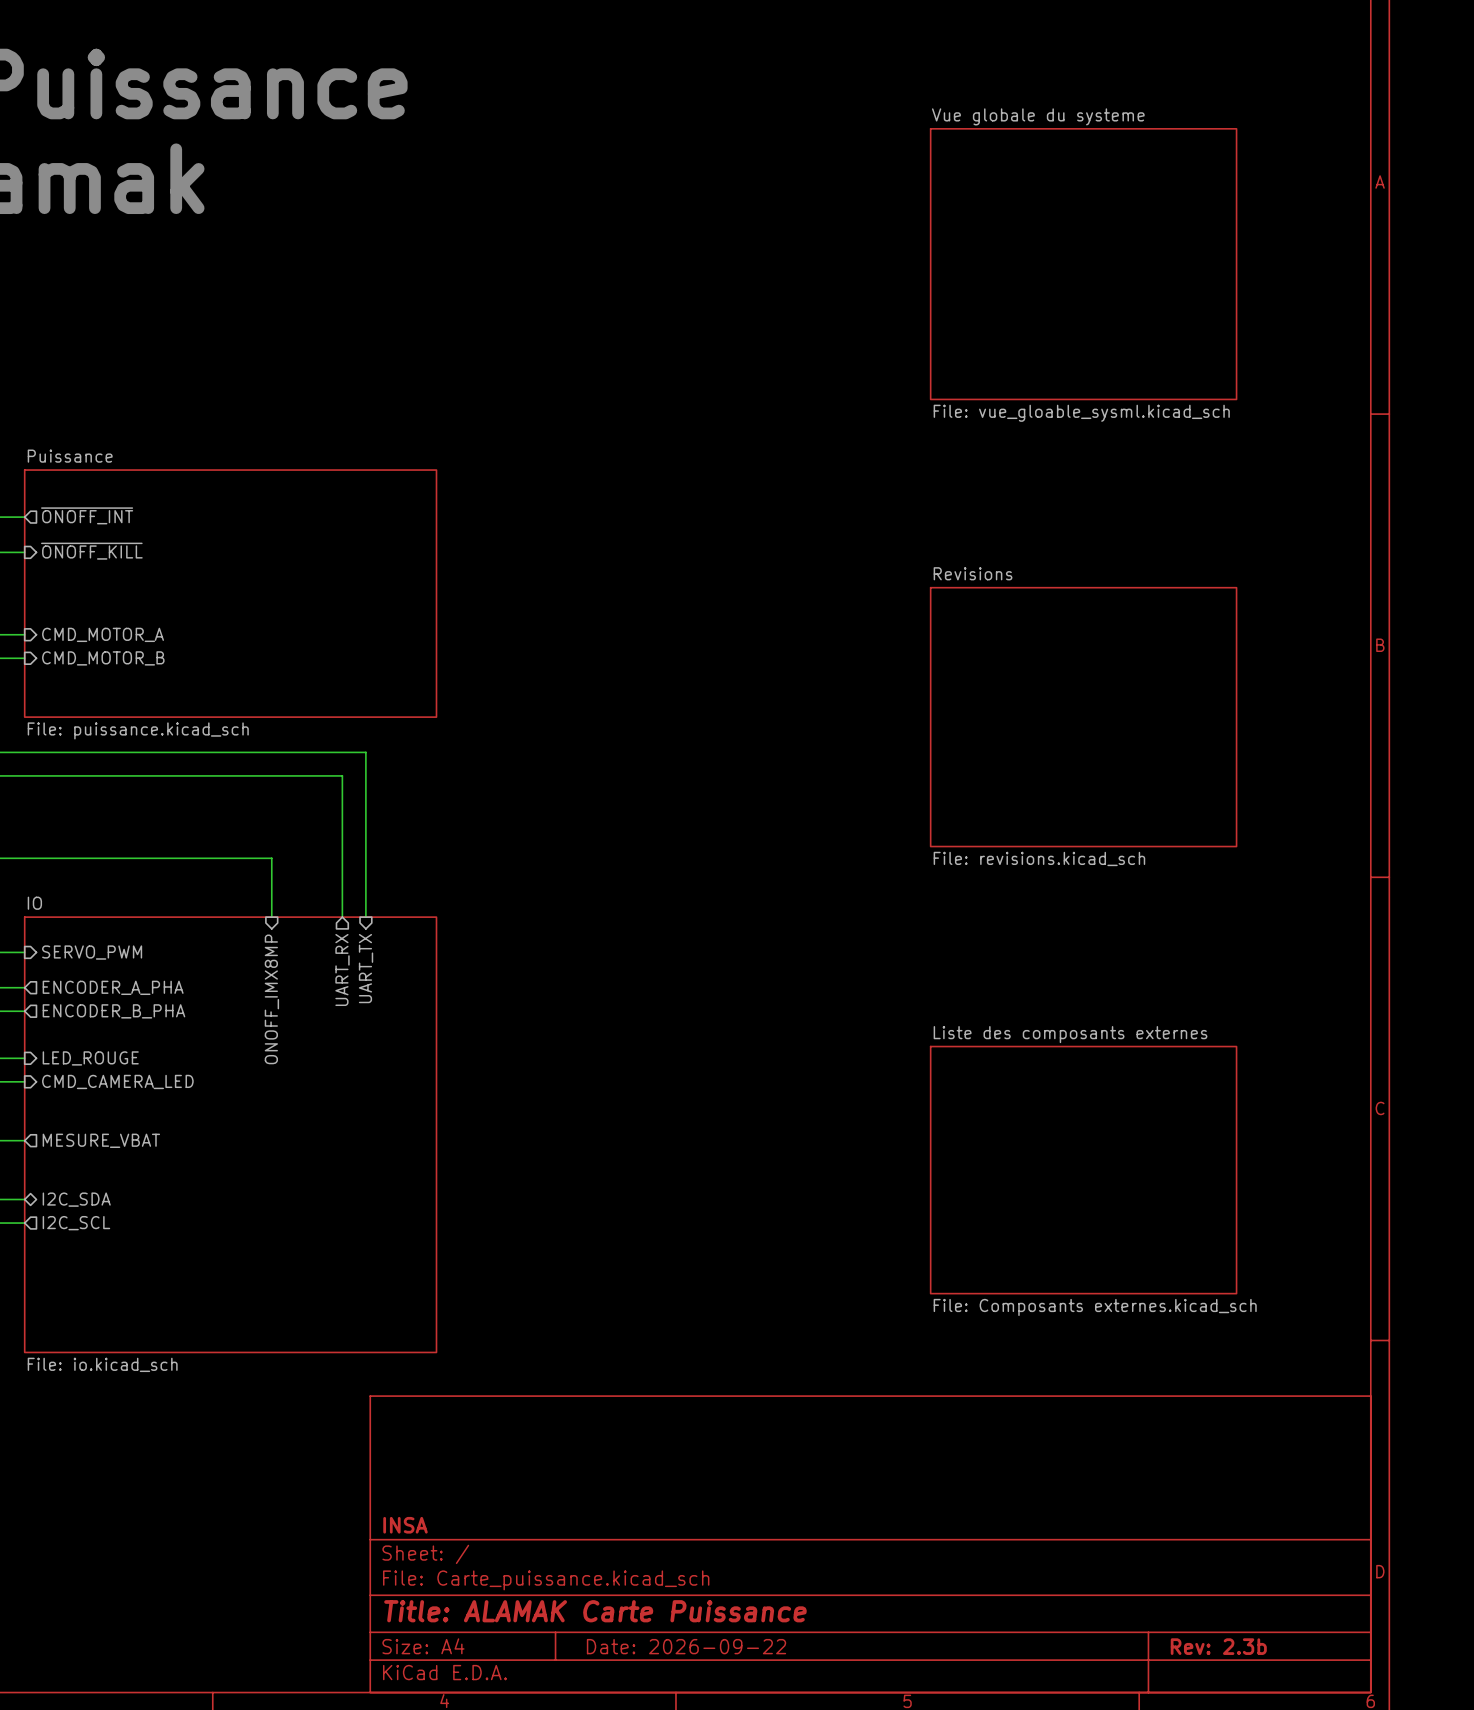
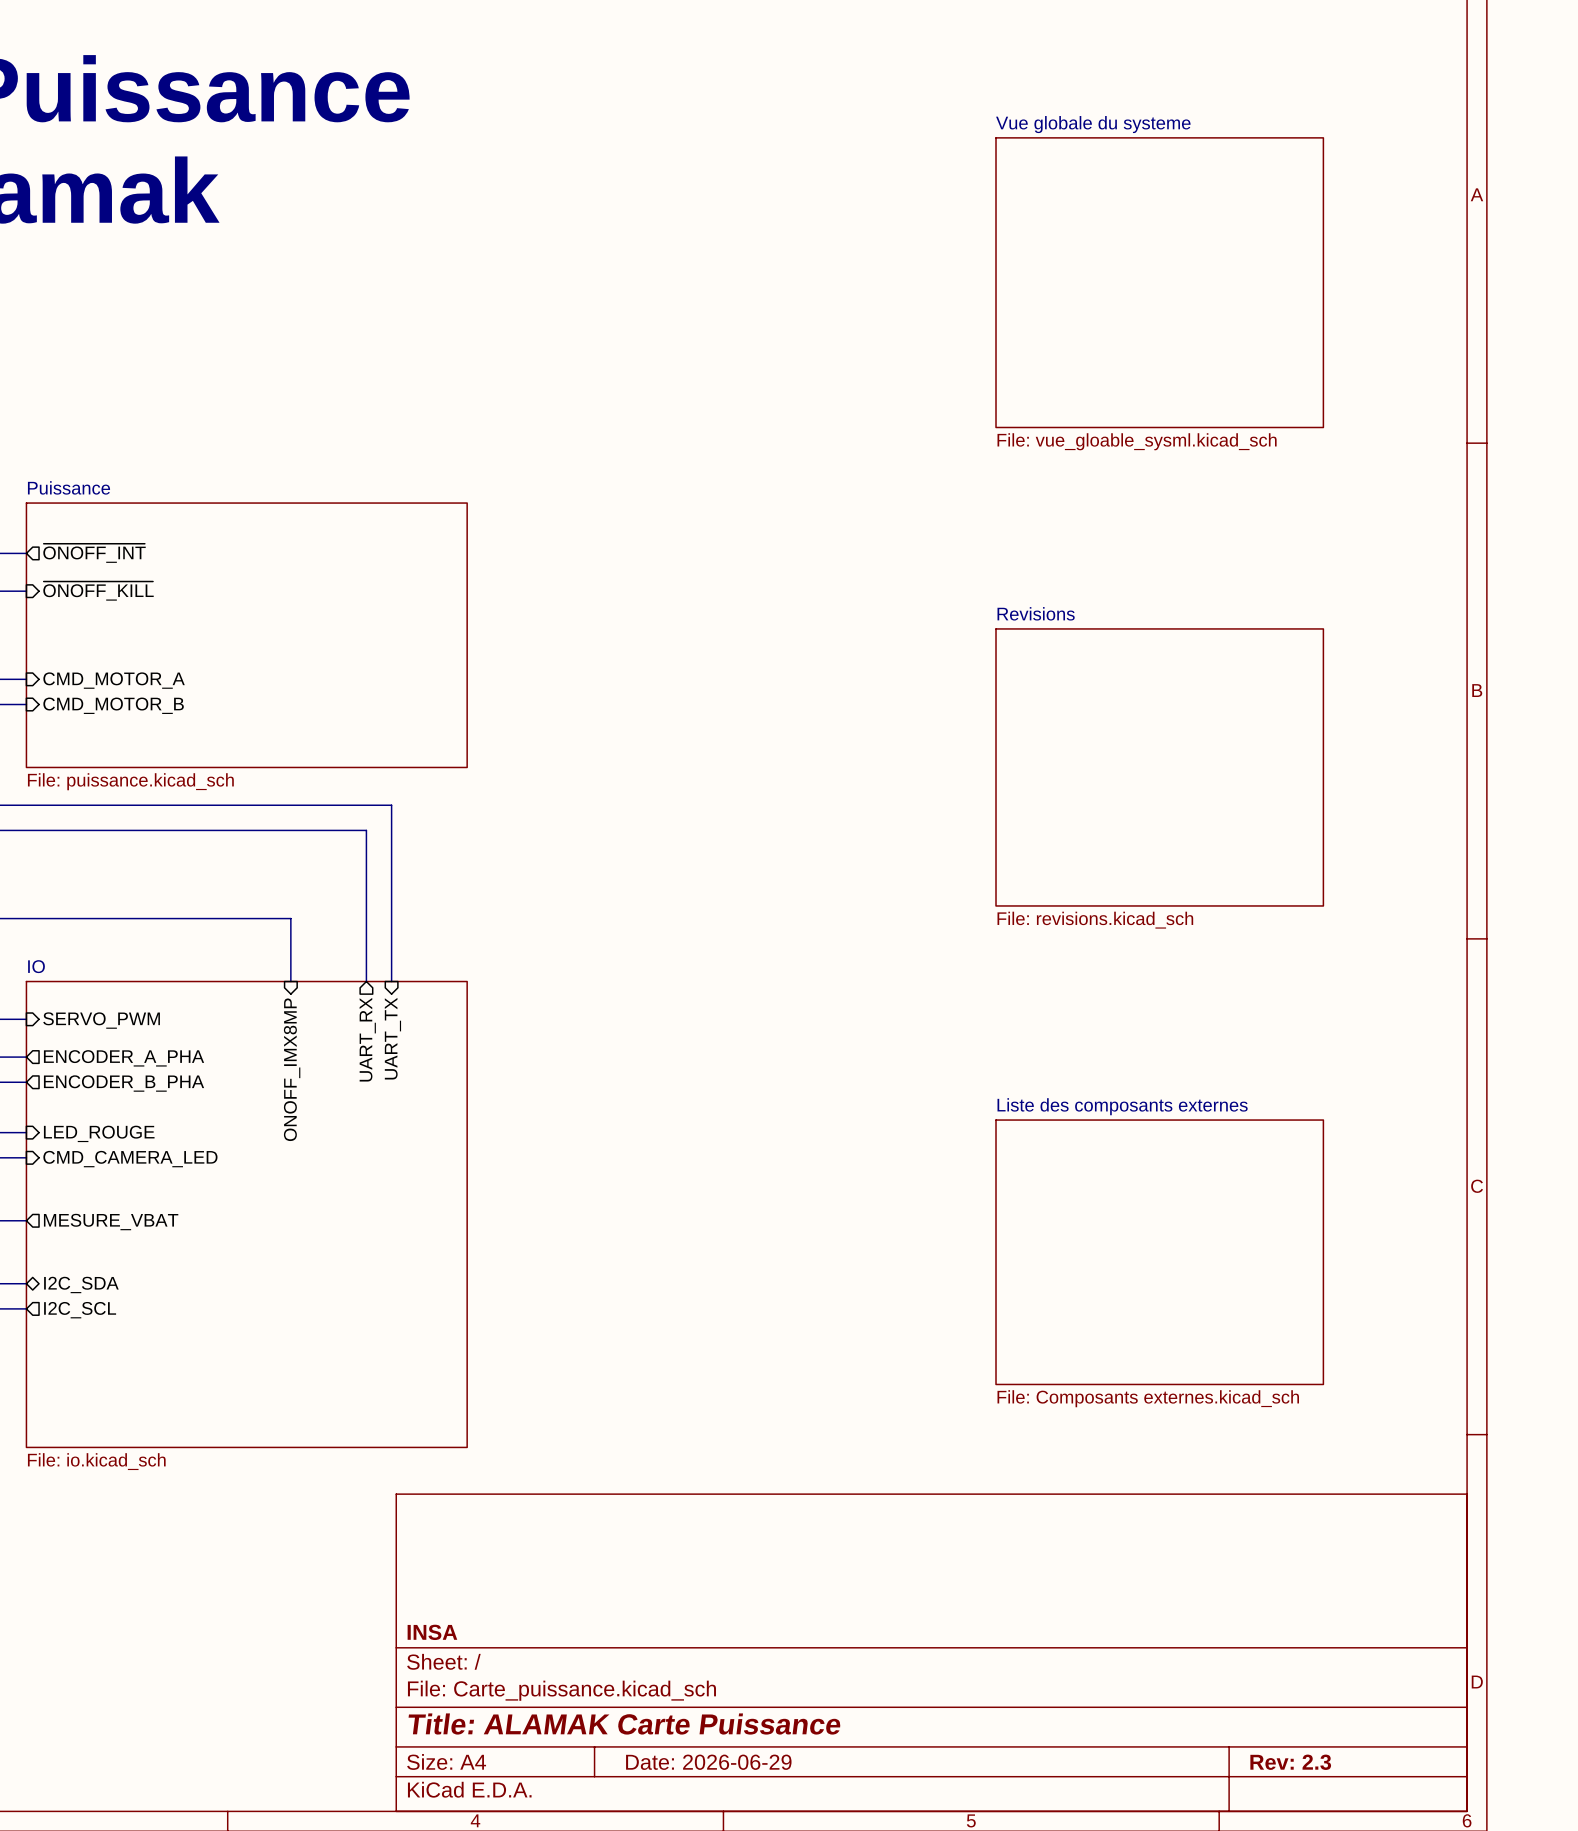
title block: Date: 2026-09-22 (686, 1646) -> Date: 2026-06-29 (708, 1762)
title block: Rev: 2.3b (1218, 1646) -> Rev: 2.3 (1290, 1762)

